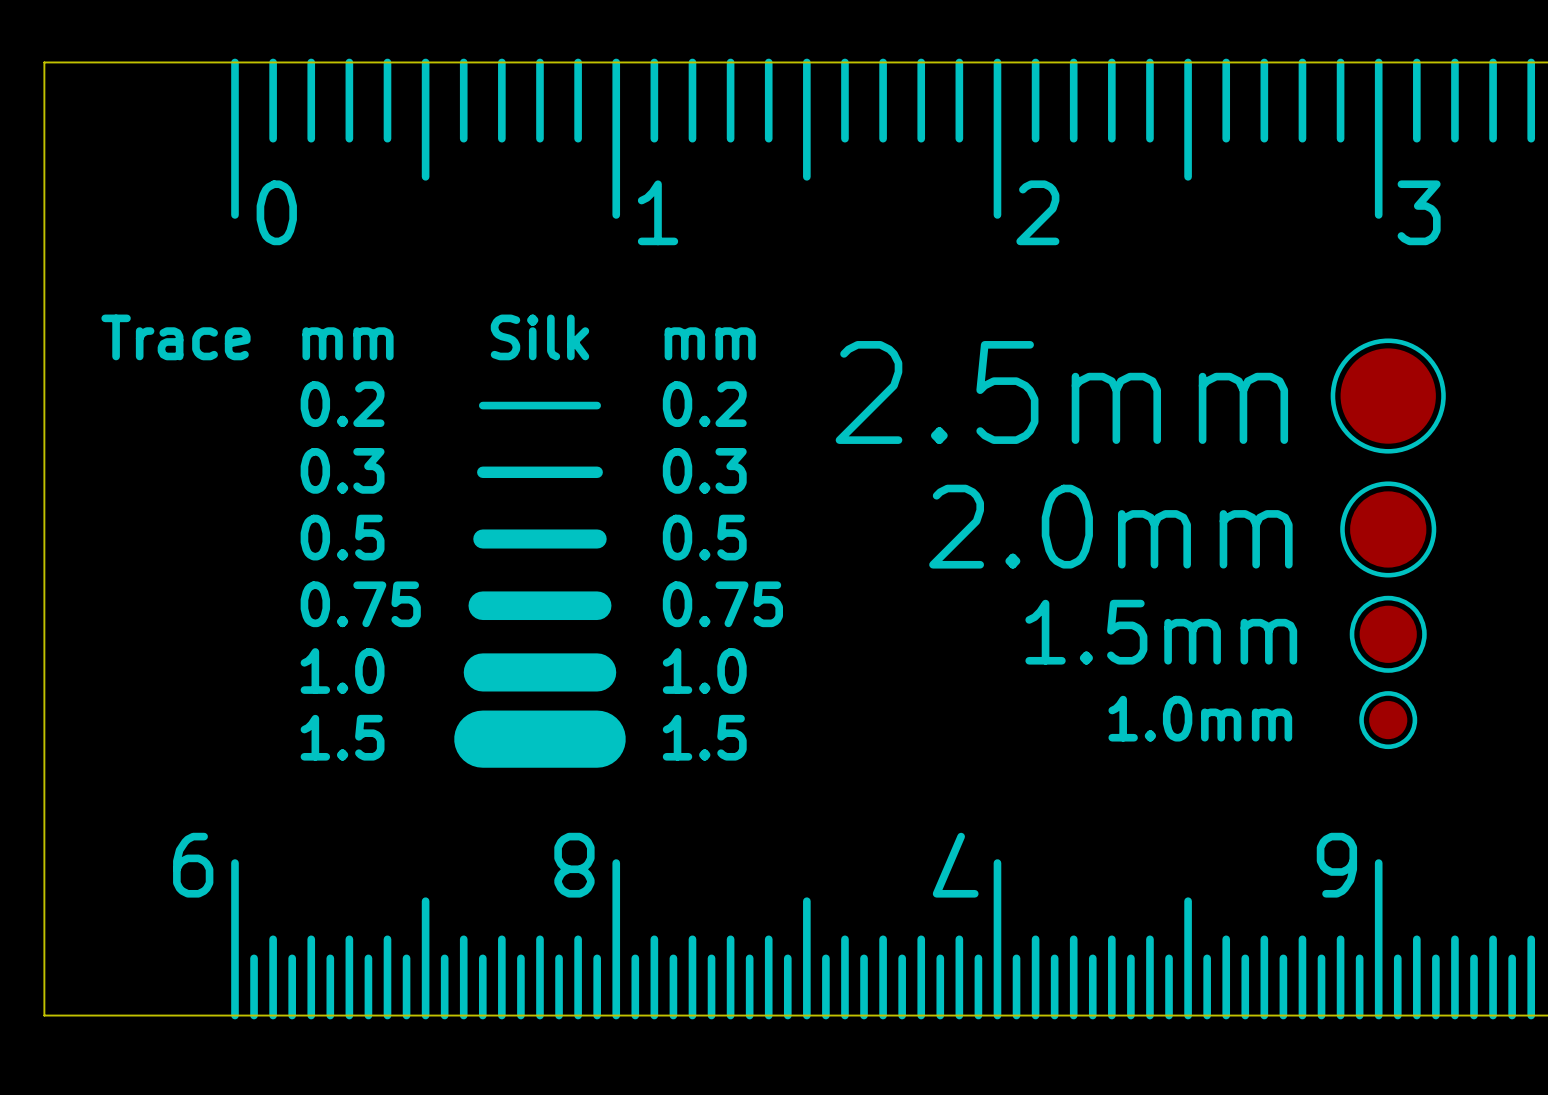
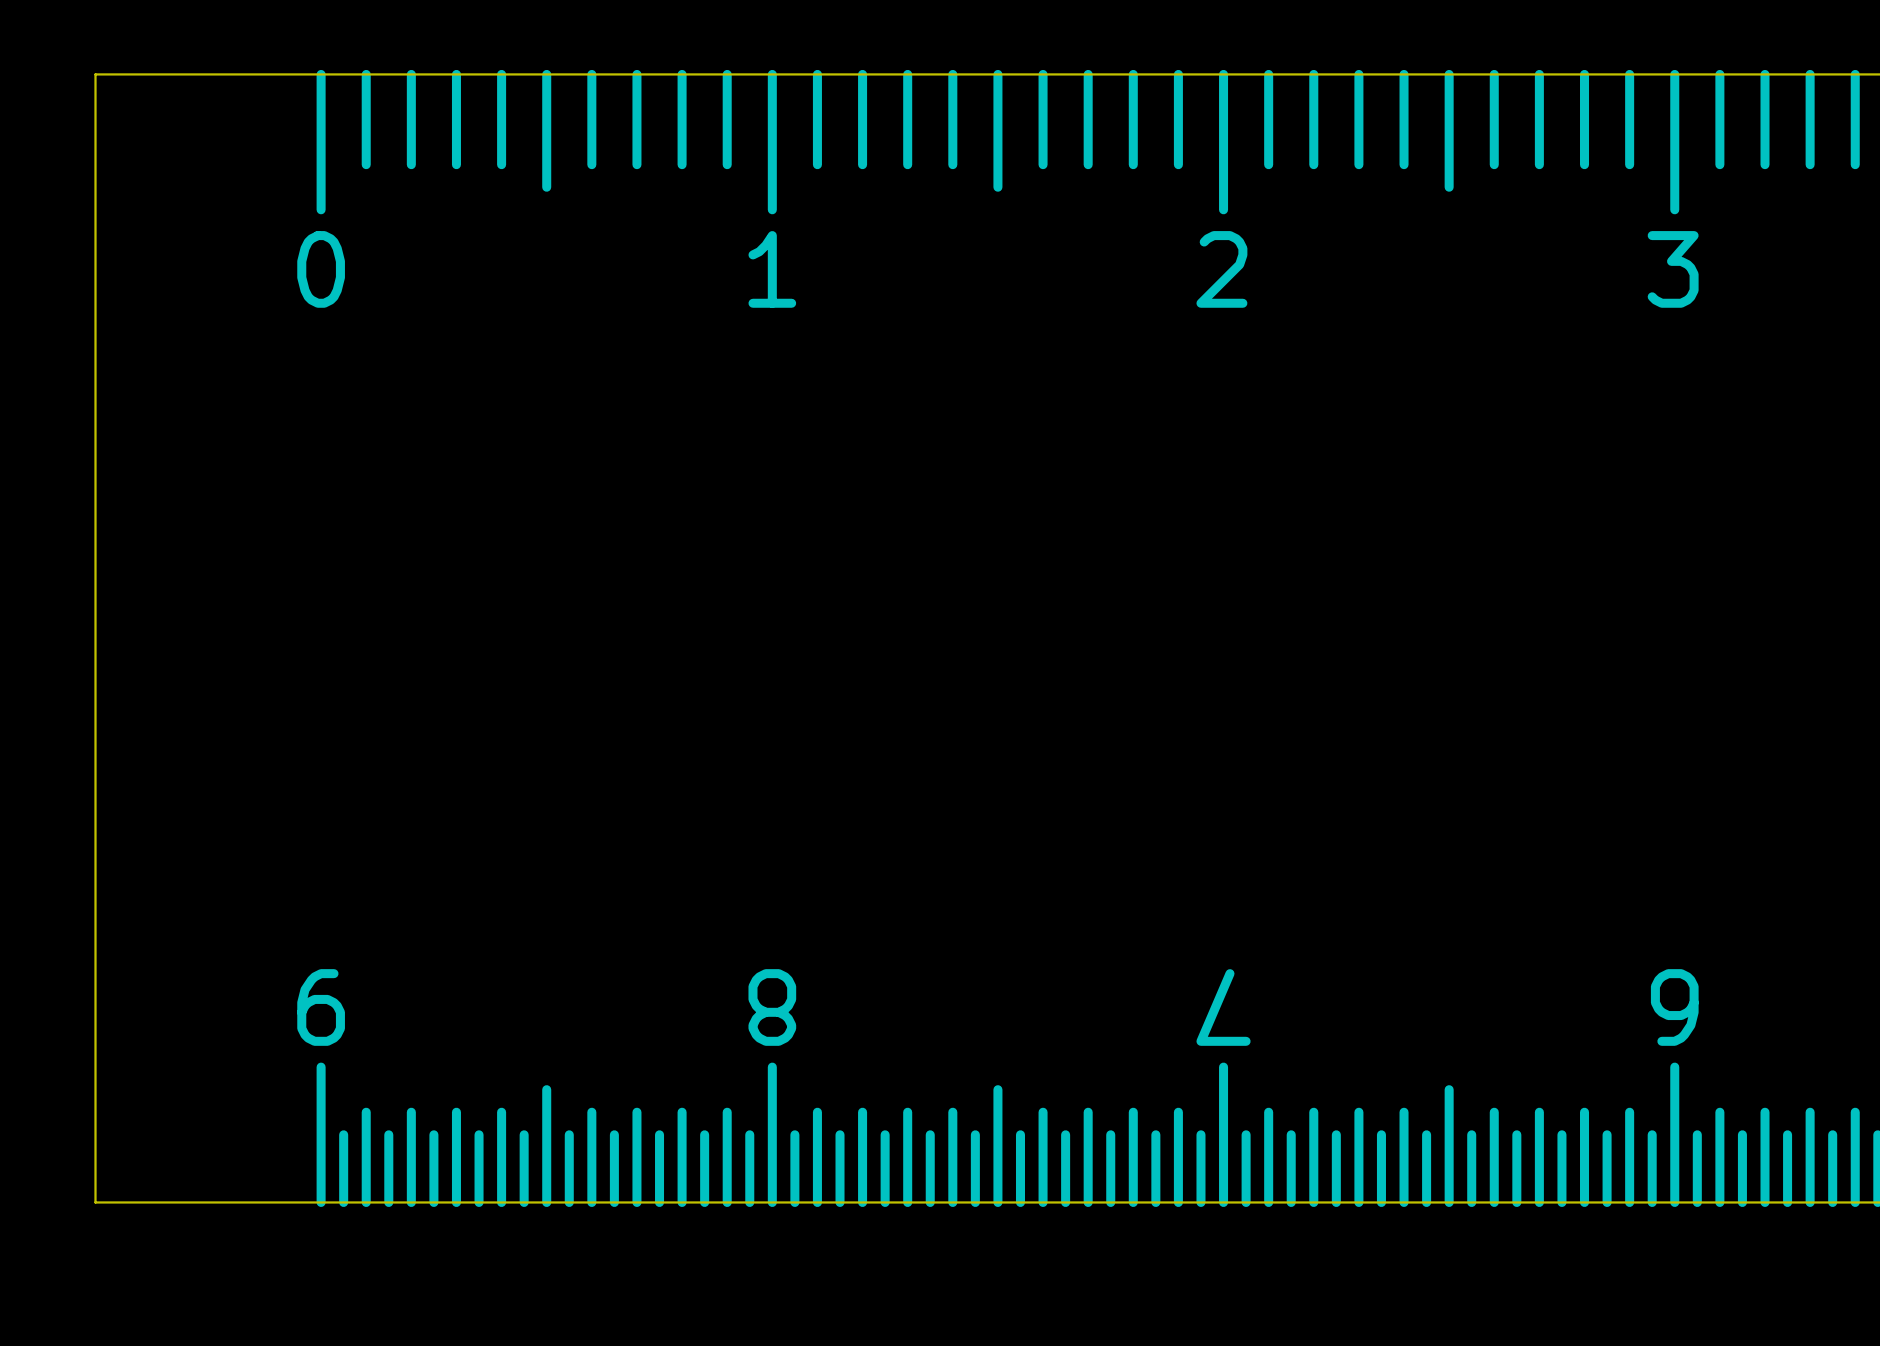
line: (425, 157) (425, 176) -> none
line: (806, 157) (806, 176) -> none
line: (1188, 157) (1188, 176) -> none
line: (234, 176) (234, 214) -> none
line: (616, 176) (616, 214) -> none
line: (997, 176) (997, 214) -> none
line: (1378, 176) (1378, 214) -> none
text position: 0 (276, 212) -> 0 (321, 269)
text position: 1 (658, 212) -> 1 (772, 269)
text position: 2 (1037, 212) -> 2 (1221, 269)
text position: 3 (1419, 212) -> 3 (1673, 269)
text: Trace (175, 337) -> none
text: Silk (539, 337) -> none
text: mm (348, 343) -> none
text: mm (710, 343) -> none
text: 2.5mm (1061, 392) -> none
part: (1388, 396) -> none
text: 0.2 (342, 404) -> none
text: 0.2 (704, 404) -> none
line: (482, 405) (597, 405) -> none
text: 0.3 (342, 470) -> none
text: 0.3 (704, 470) -> none
line: (482, 472) (597, 472) -> none
text: 2.0mm (1110, 526) -> none
part: (1388, 529) -> none
text: 0.5 (342, 537) -> none
text: 0.5 (704, 537) -> none
line: (482, 539) (597, 539) -> none
text: 0.75 (360, 604) -> none
text: 0.75 (722, 604) -> none
line: (482, 605) (597, 605) -> none
text: 1.5mm (1161, 632) -> none
part: (1388, 634) -> none
text: 1.0 (342, 671) -> none
text: 1.0 (704, 671) -> none
line: (482, 672) (597, 672) -> none
text: 1.0mm (1200, 718) -> none
part: (1388, 720) -> none
text: 1.5 (342, 737) -> none
text: 1.5 (704, 737) -> none
line: (482, 739) (597, 739) -> none
line: (234, 863) (234, 901) -> none
line: (616, 863) (616, 901) -> none
line: (997, 863) (997, 901) -> none
line: (1378, 863) (1378, 901) -> none
text position: 9 (193, 865) -> 9 (321, 1007)
text position: 8 (574, 865) -> 8 (772, 1007)
text position: 7 (955, 865) -> 7 (1223, 1007)
text position: 6 (1336, 865) -> 6 (1674, 1007)
line: (425, 901) (425, 920) -> none
line: (806, 901) (806, 920) -> none
line: (1188, 901) (1188, 920) -> none

